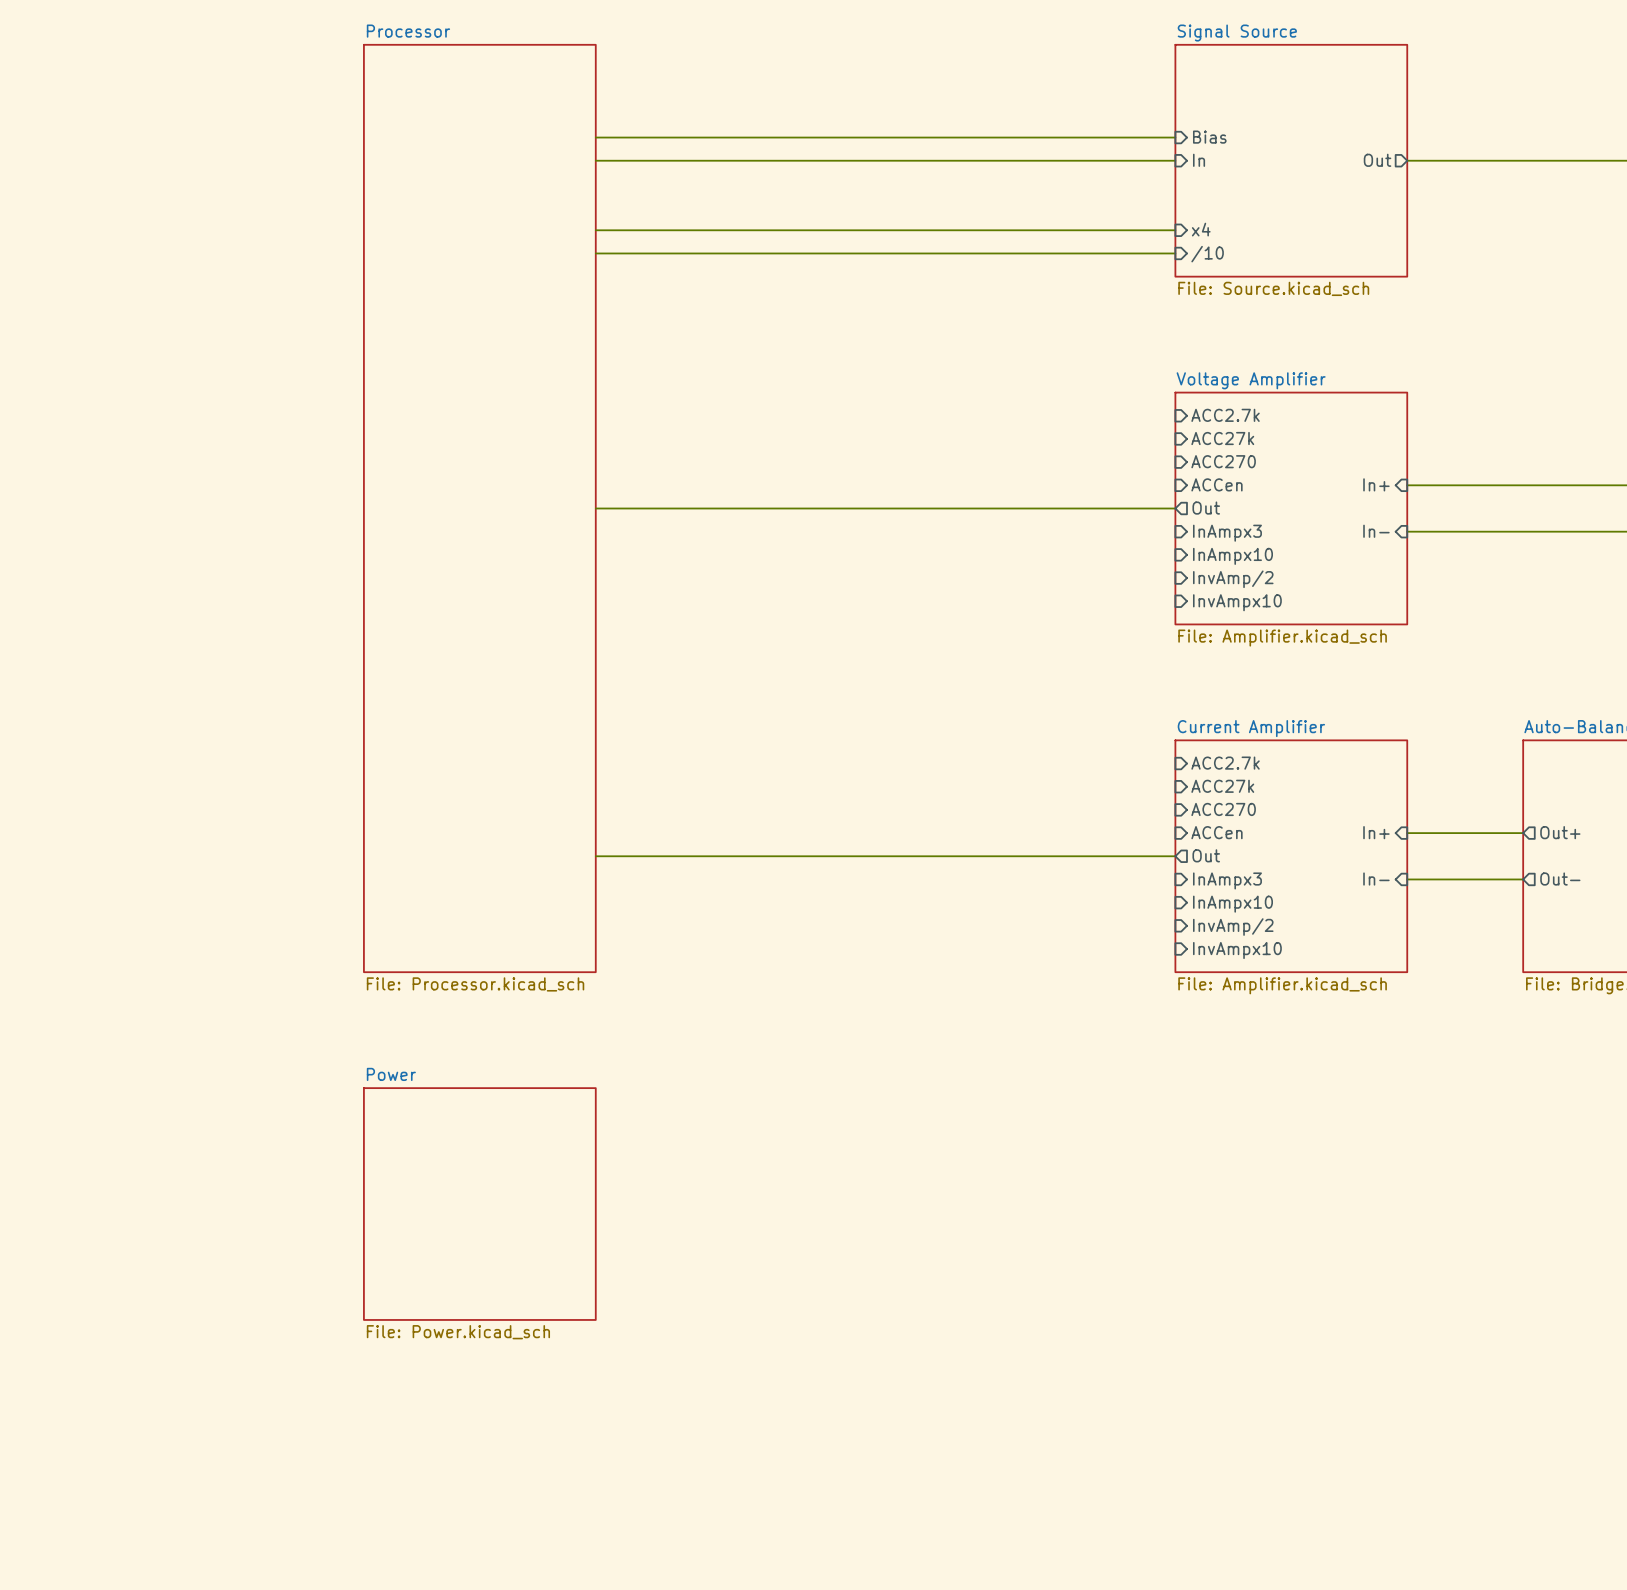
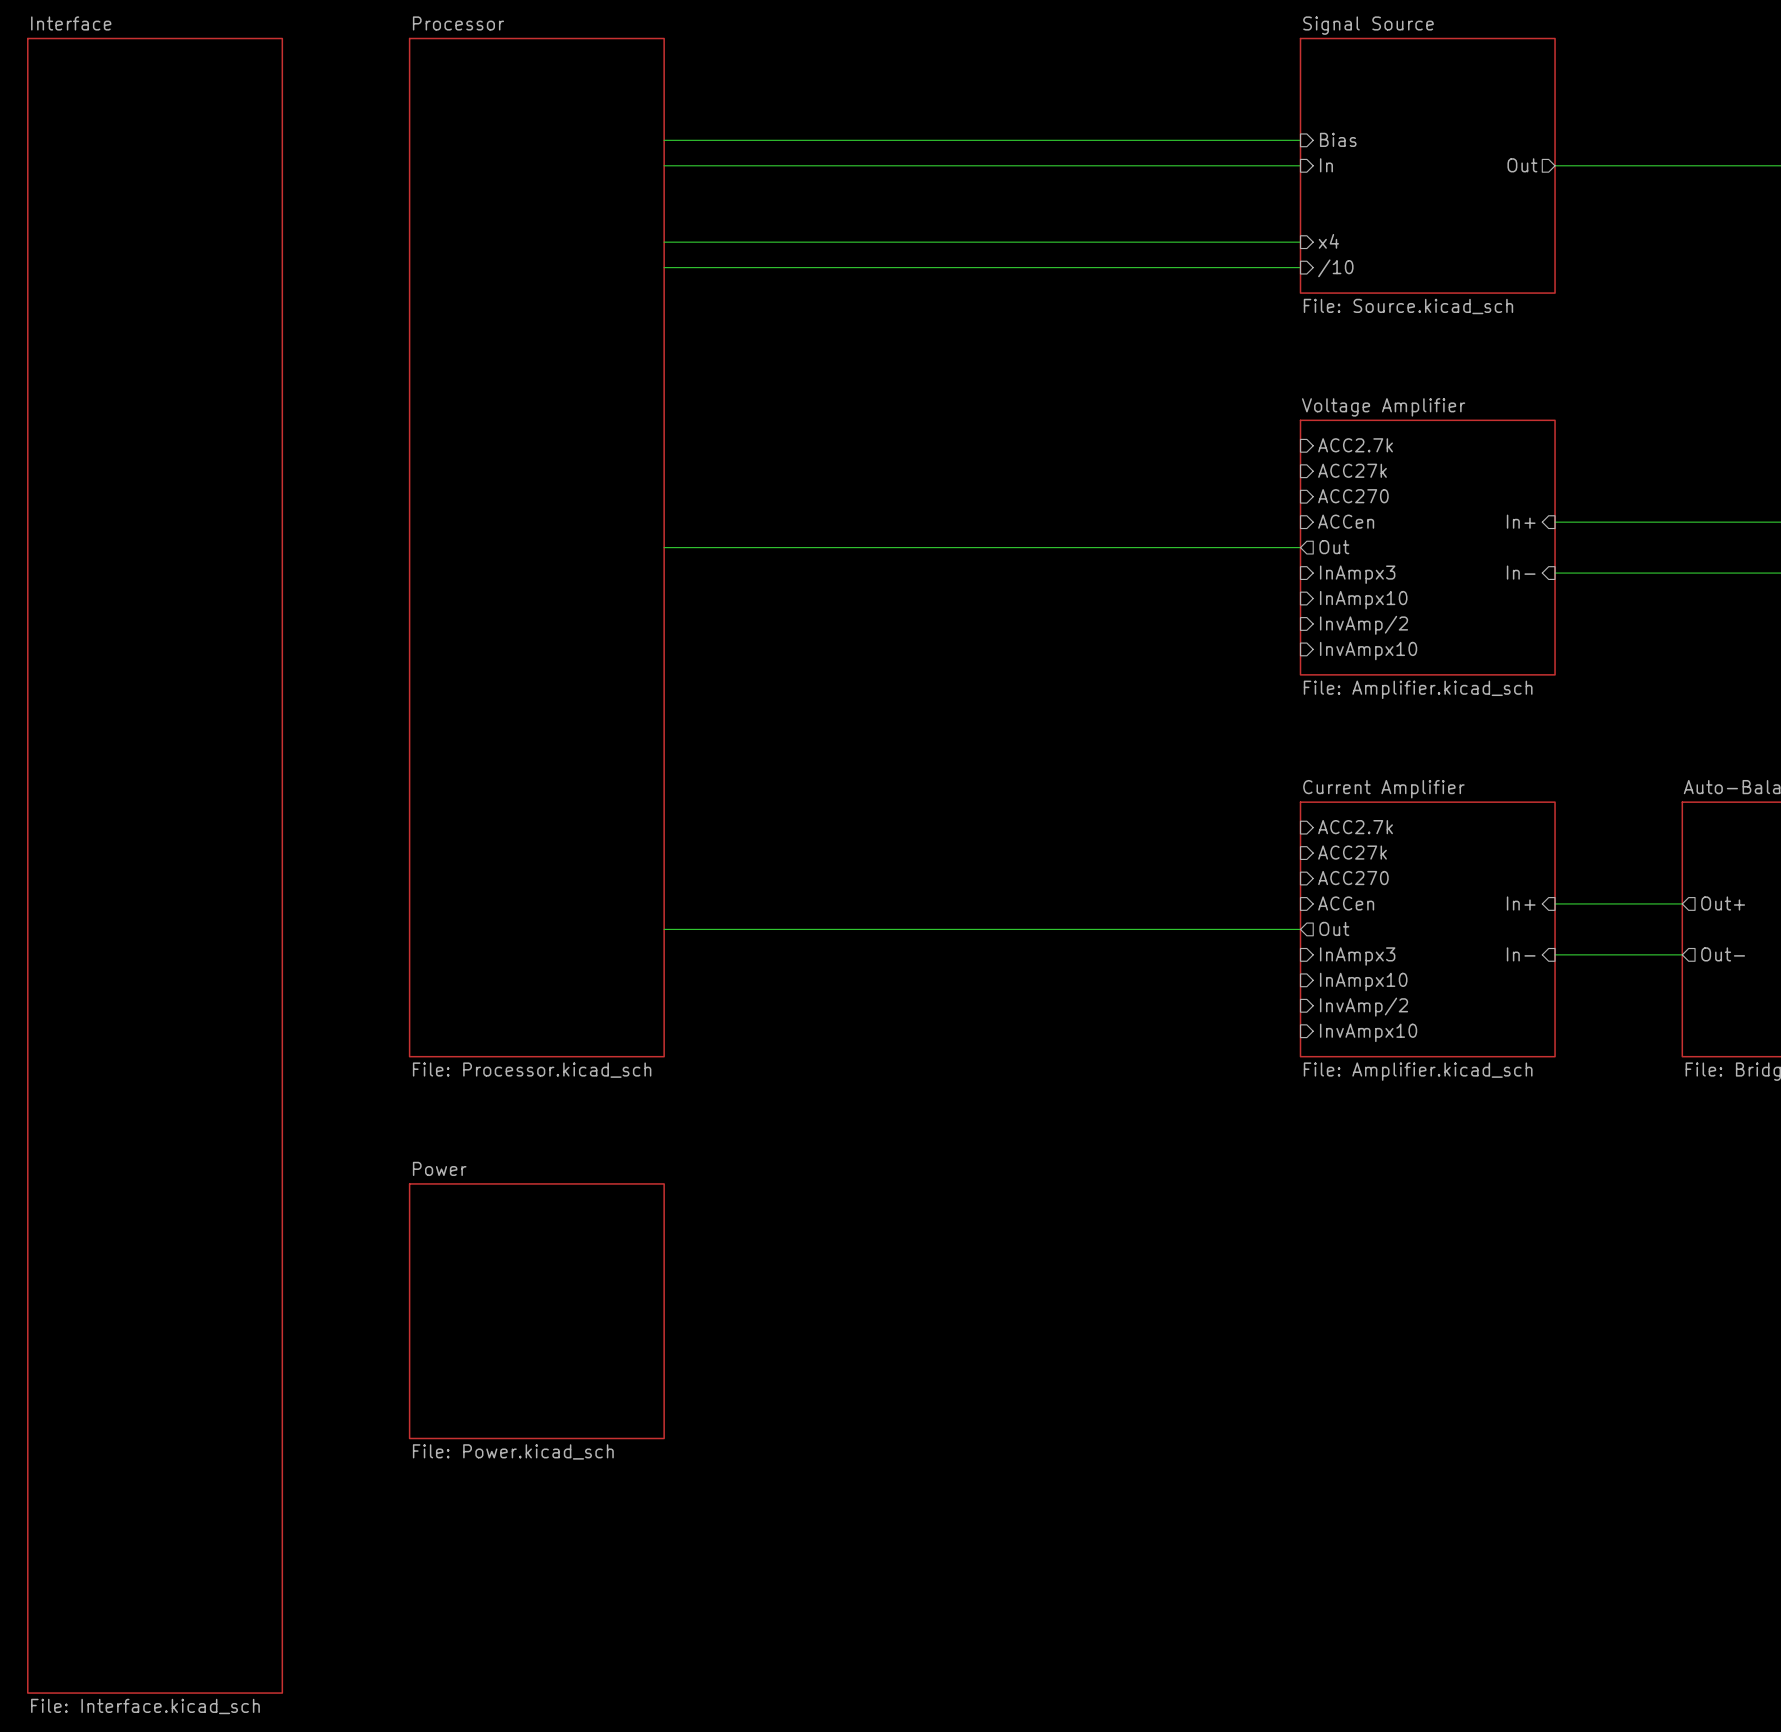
sheet Interface: none -> File: Interface.kicad_sch (155, 865)

